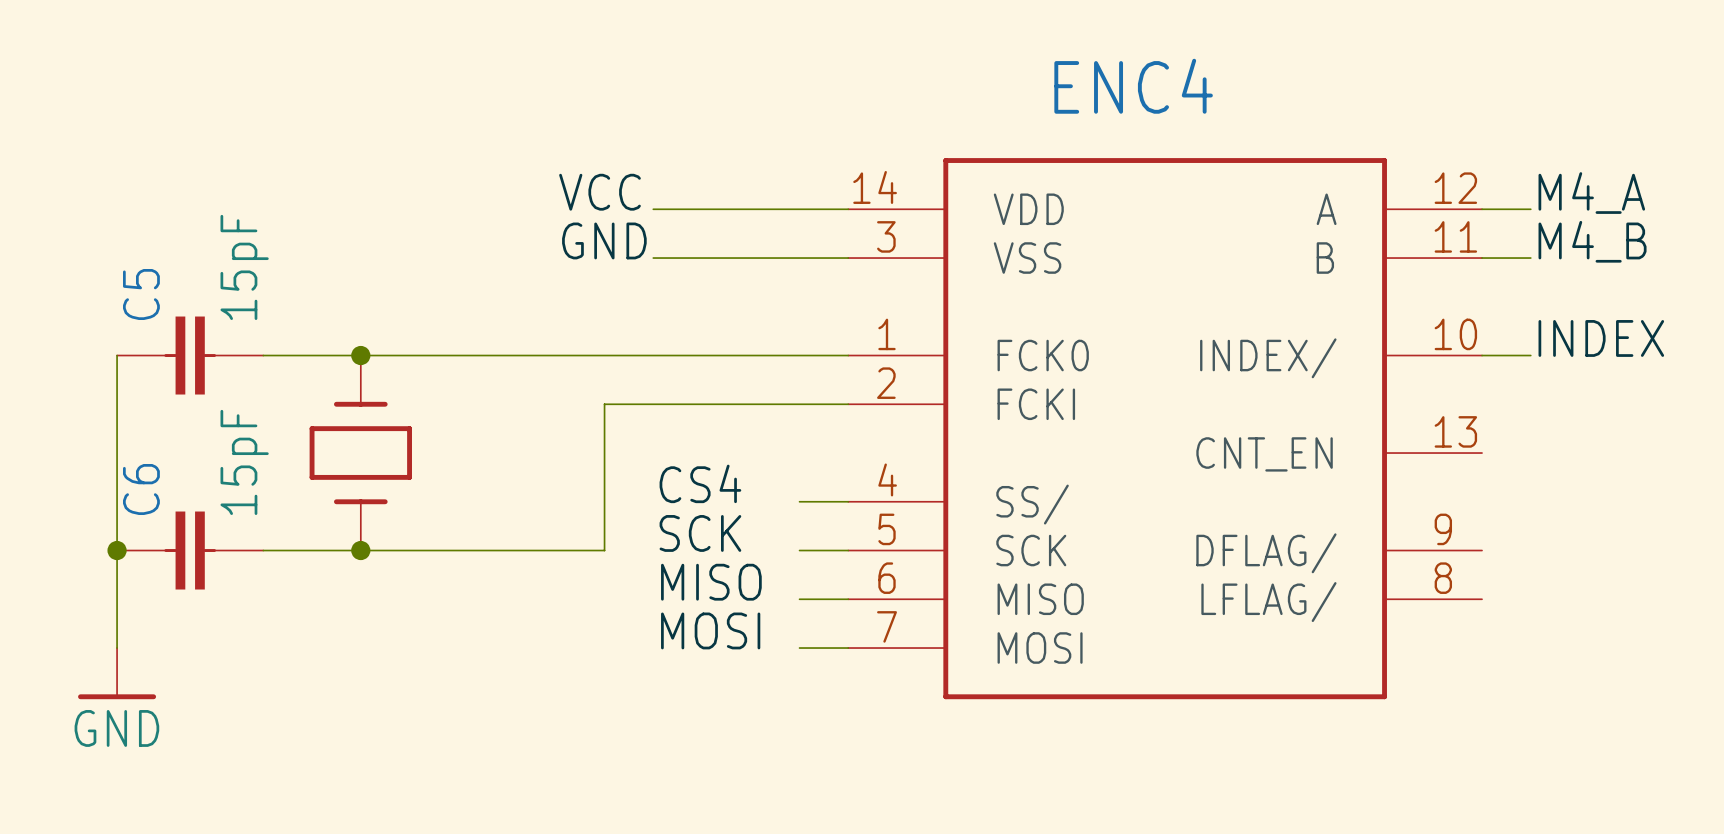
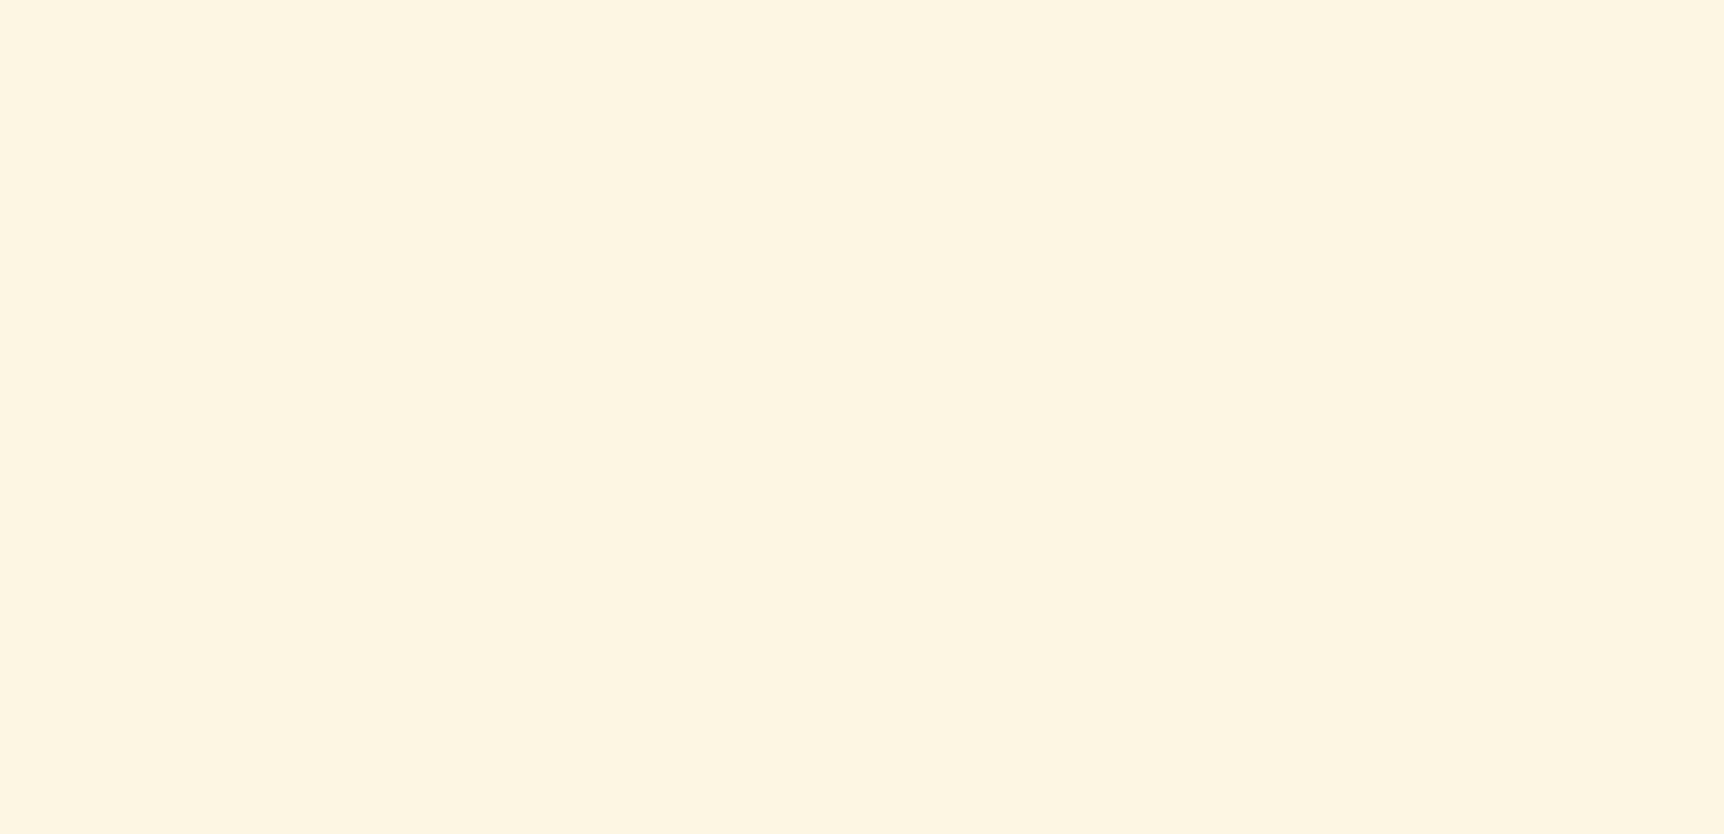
label: VCC (600, 192) -> none
label: M4_A (1591, 193) -> none
wire: (653, 209) (848, 209) -> none
wire: (1482, 209) (1530, 209) -> none
label: GND (604, 240) -> none
label: M4_B (1592, 241) -> none
wire: (653, 258) (848, 258) -> none
wire: (1482, 258) (1530, 258) -> none
label: INDEX (1601, 338) -> none
wire: (117, 355) (117, 648) -> none
C5: 15pF (190, 355) -> none
wire: (263, 355) (848, 355) -> none
junction: (360, 355) -> none
wire: (1482, 355) (1530, 355) -> none
wire: (848, 404) (604, 404) (604, 550) (263, 550) -> none
ENC4: (1165, 428) -> none
part: (360, 453) -> none
label: CS4 (700, 483) -> none
wire: (799, 501) (848, 501) -> none
label: SCK (700, 533) -> none
junction: (117, 550) -> none
C6: 15pF (190, 550) -> none
junction: (360, 550) -> none
wire: (799, 550) (848, 550) -> none
label: MISO (711, 582) -> none
wire: (799, 599) (848, 599) -> none
label: MOSI (710, 630) -> none
wire: (799, 648) (848, 648) -> none
power symbol: GND (117, 673) -> none

